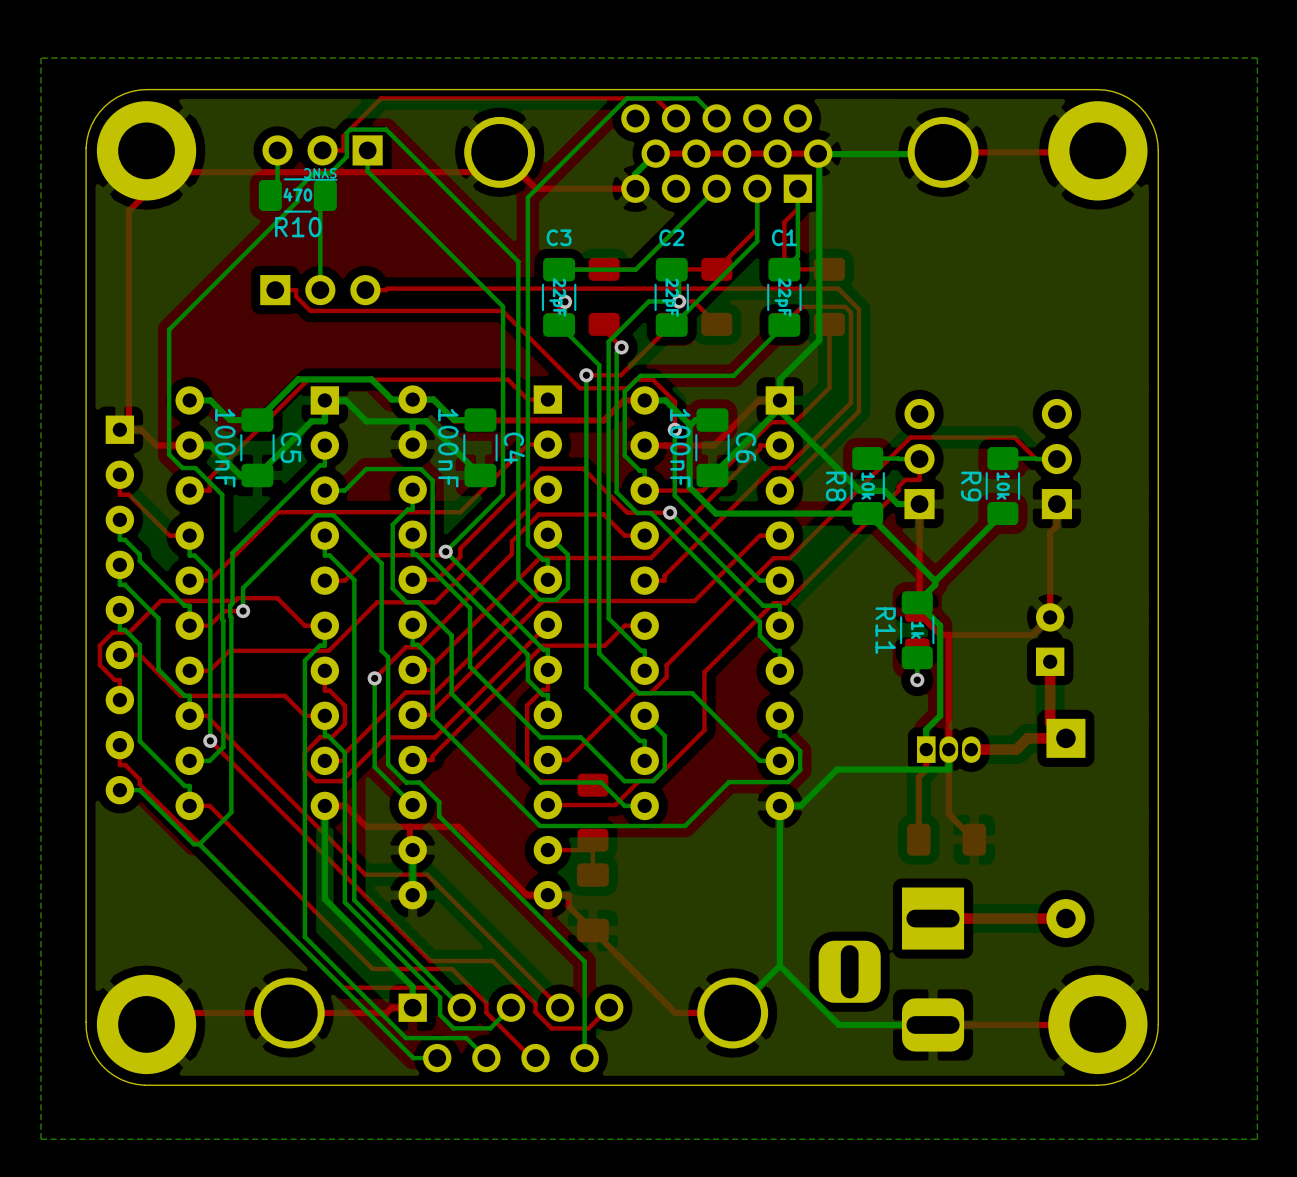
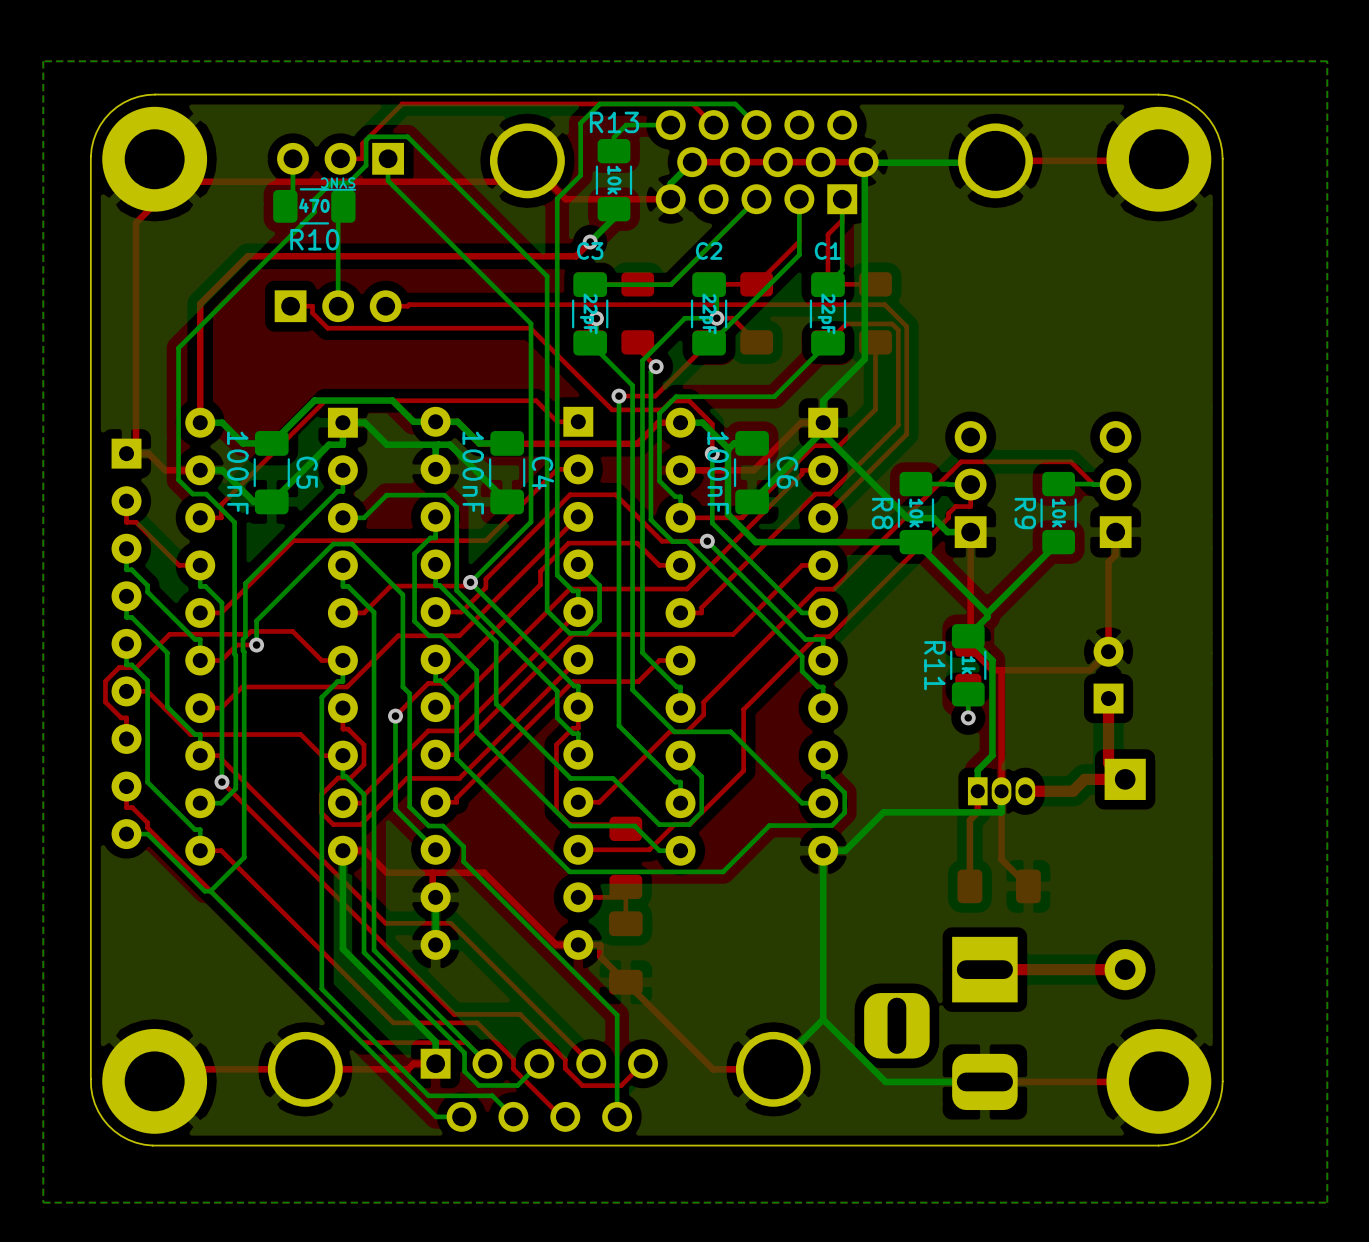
bottom track: (626, 98) (527, 197) -> (661, 103) (599, 103) (580, 123) (580, 175) (557, 198) (557, 208)
bottom track: none -> (670, 125) (626, 125) (613, 137) (613, 151)
R13: none -> 10k (613, 180)
bottom track: none -> (613, 209) (613, 218) (590, 242)
top track: none -> (590, 242) (575, 256) (247, 256) (200, 303) (200, 422)
via: none -> (590, 242)

